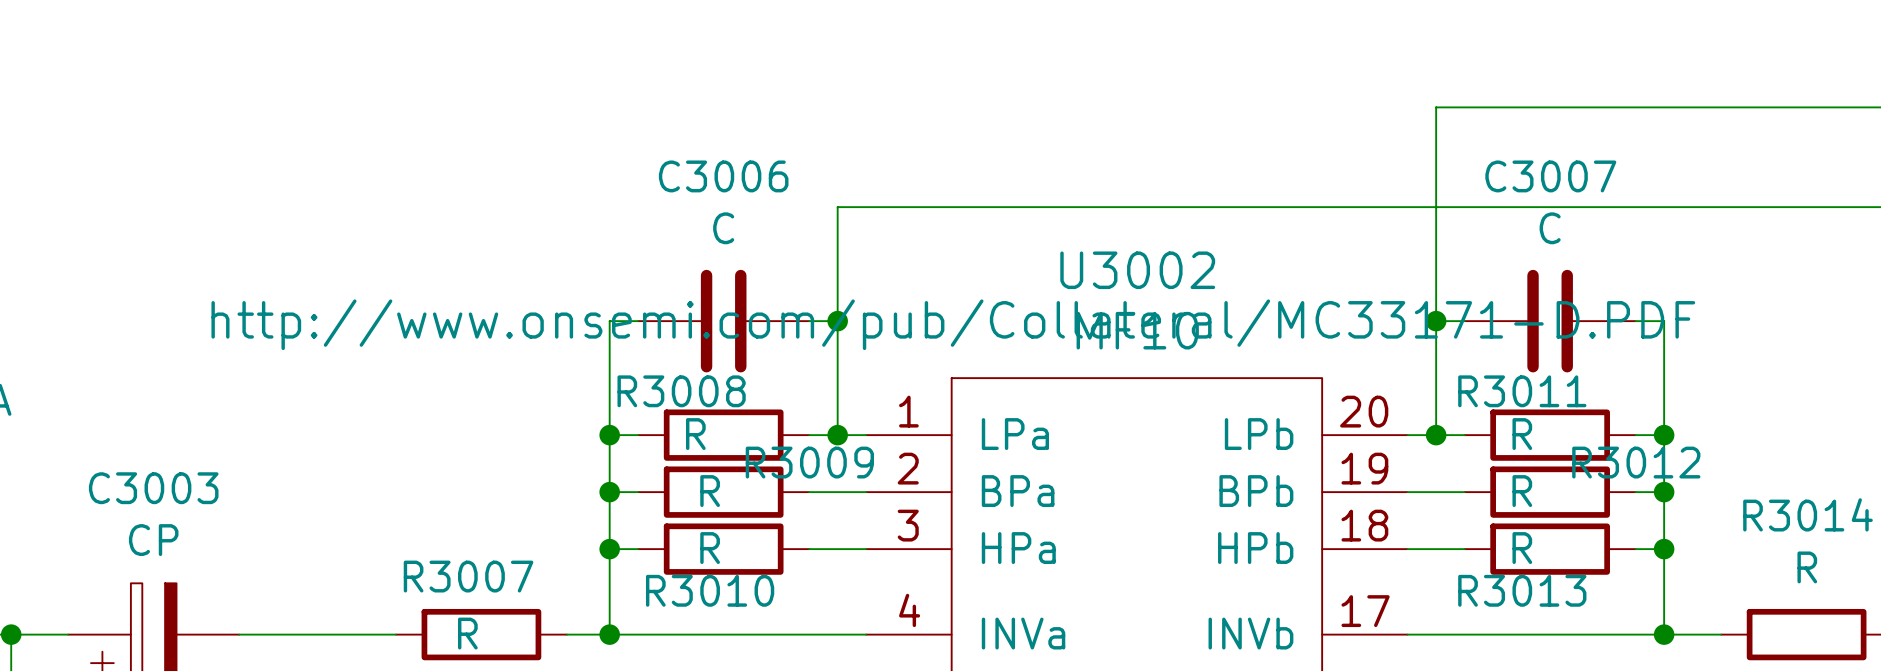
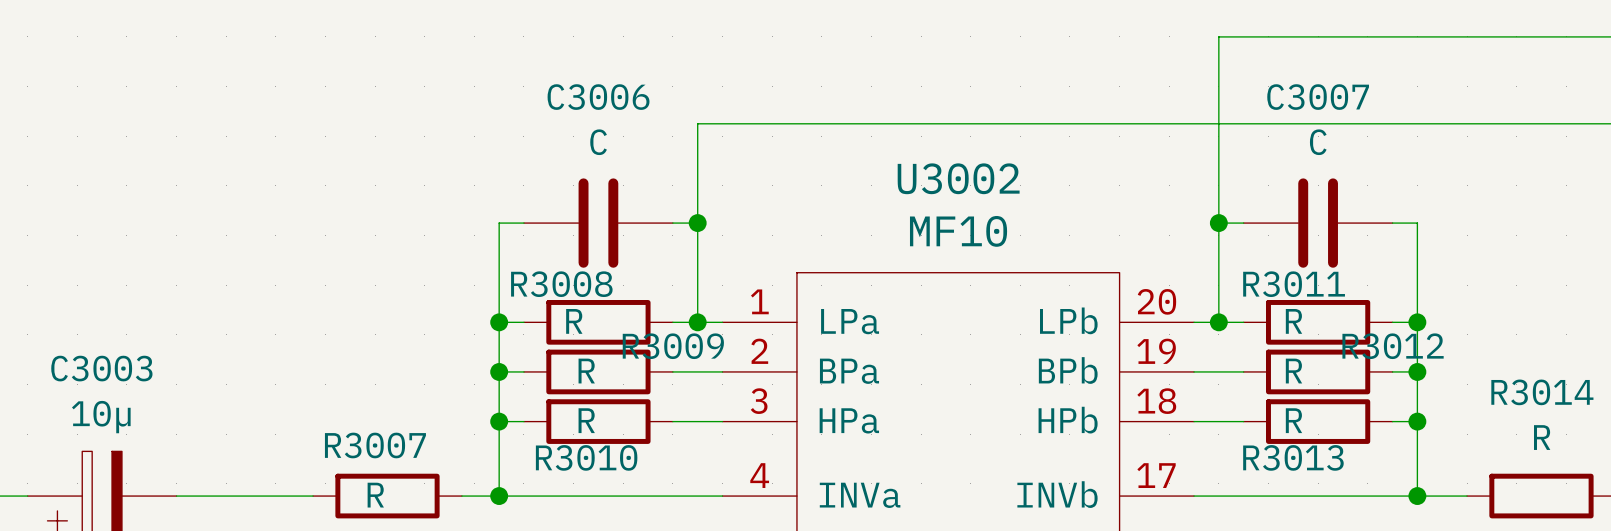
U3002 text: http://www.onsemi.com/pub/Collateral/MC33171-D.PDF (953, 324) -> none
C3003 value: CP (153, 540) -> 10µ (101, 417)

